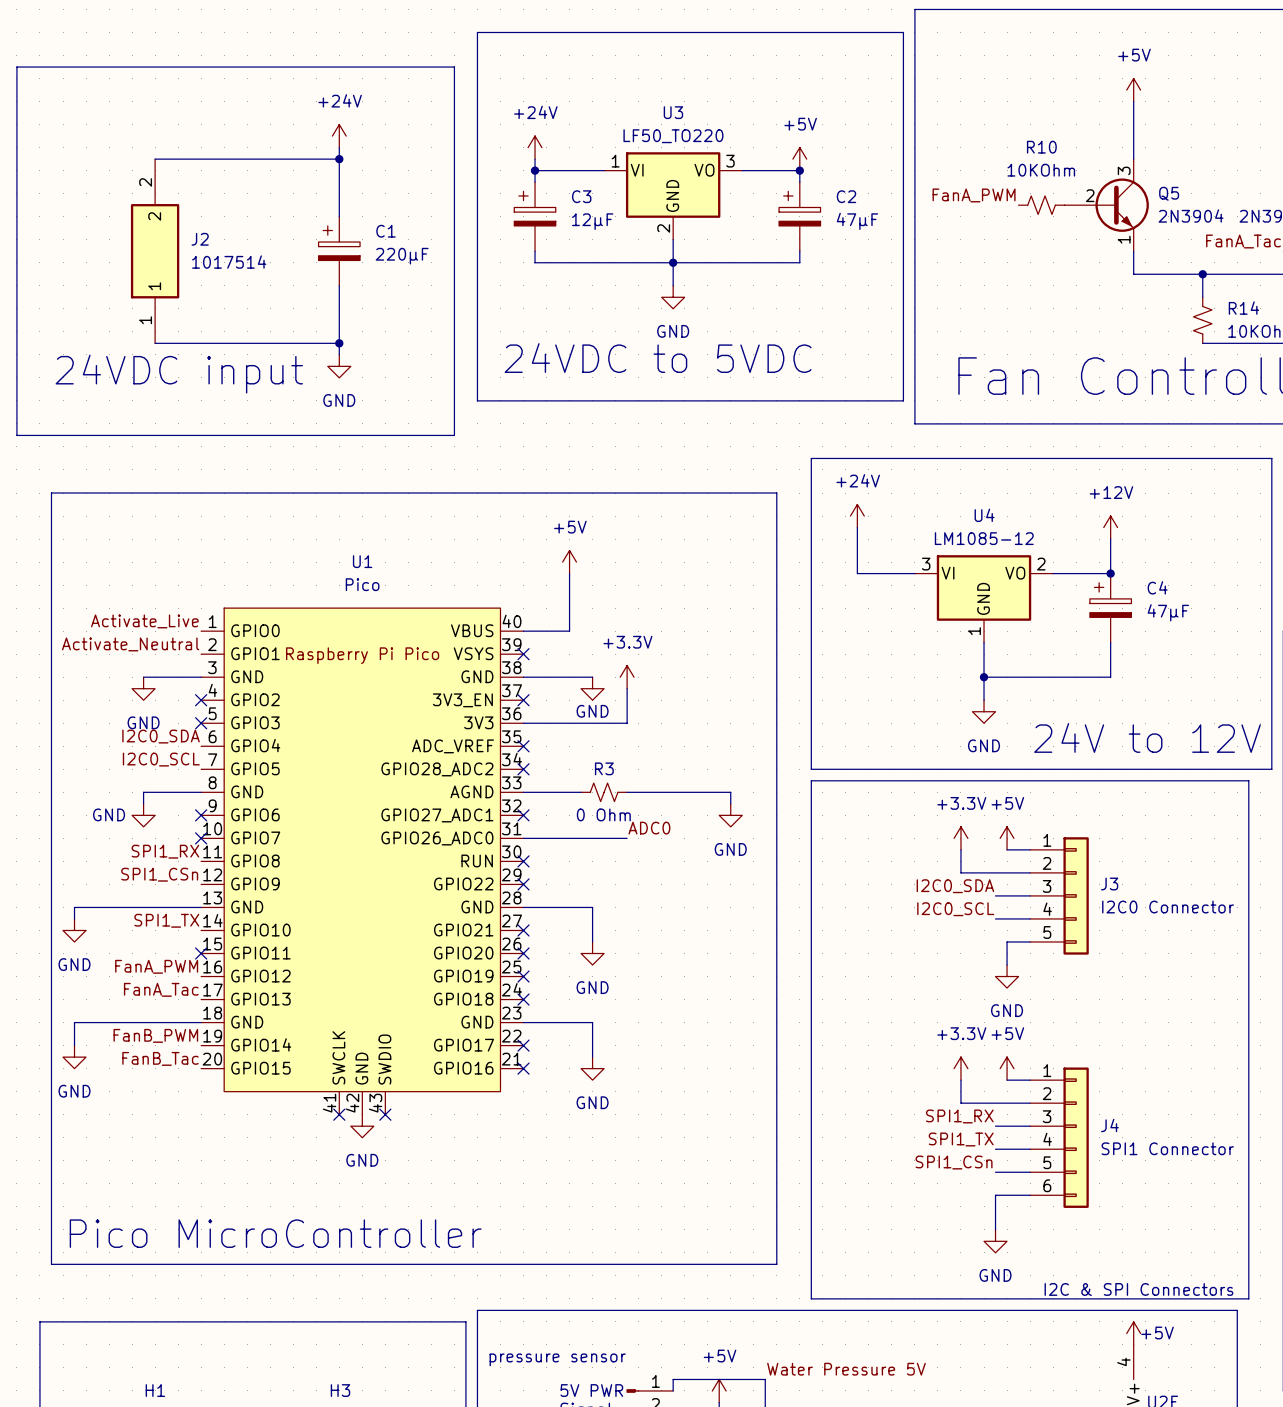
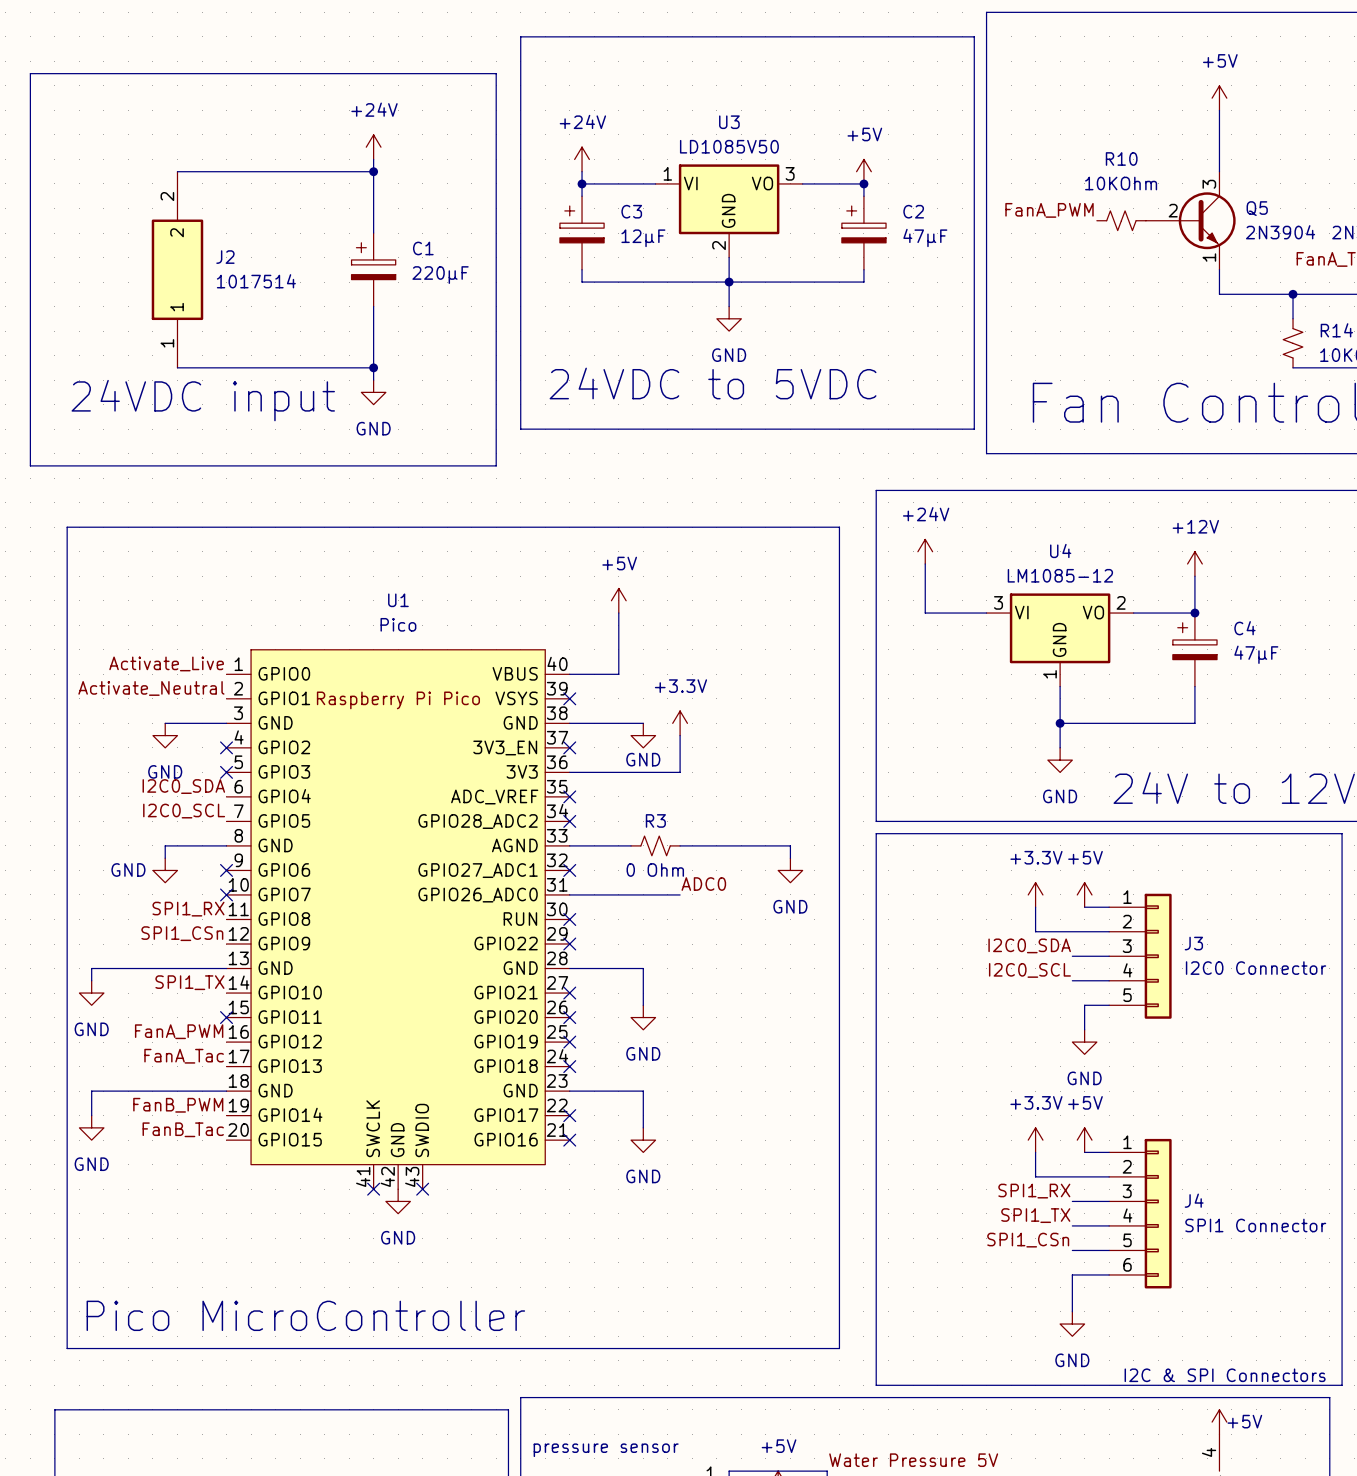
U3 value: LF50_TO220 (673, 136) -> LD1085V50 (729, 146)

